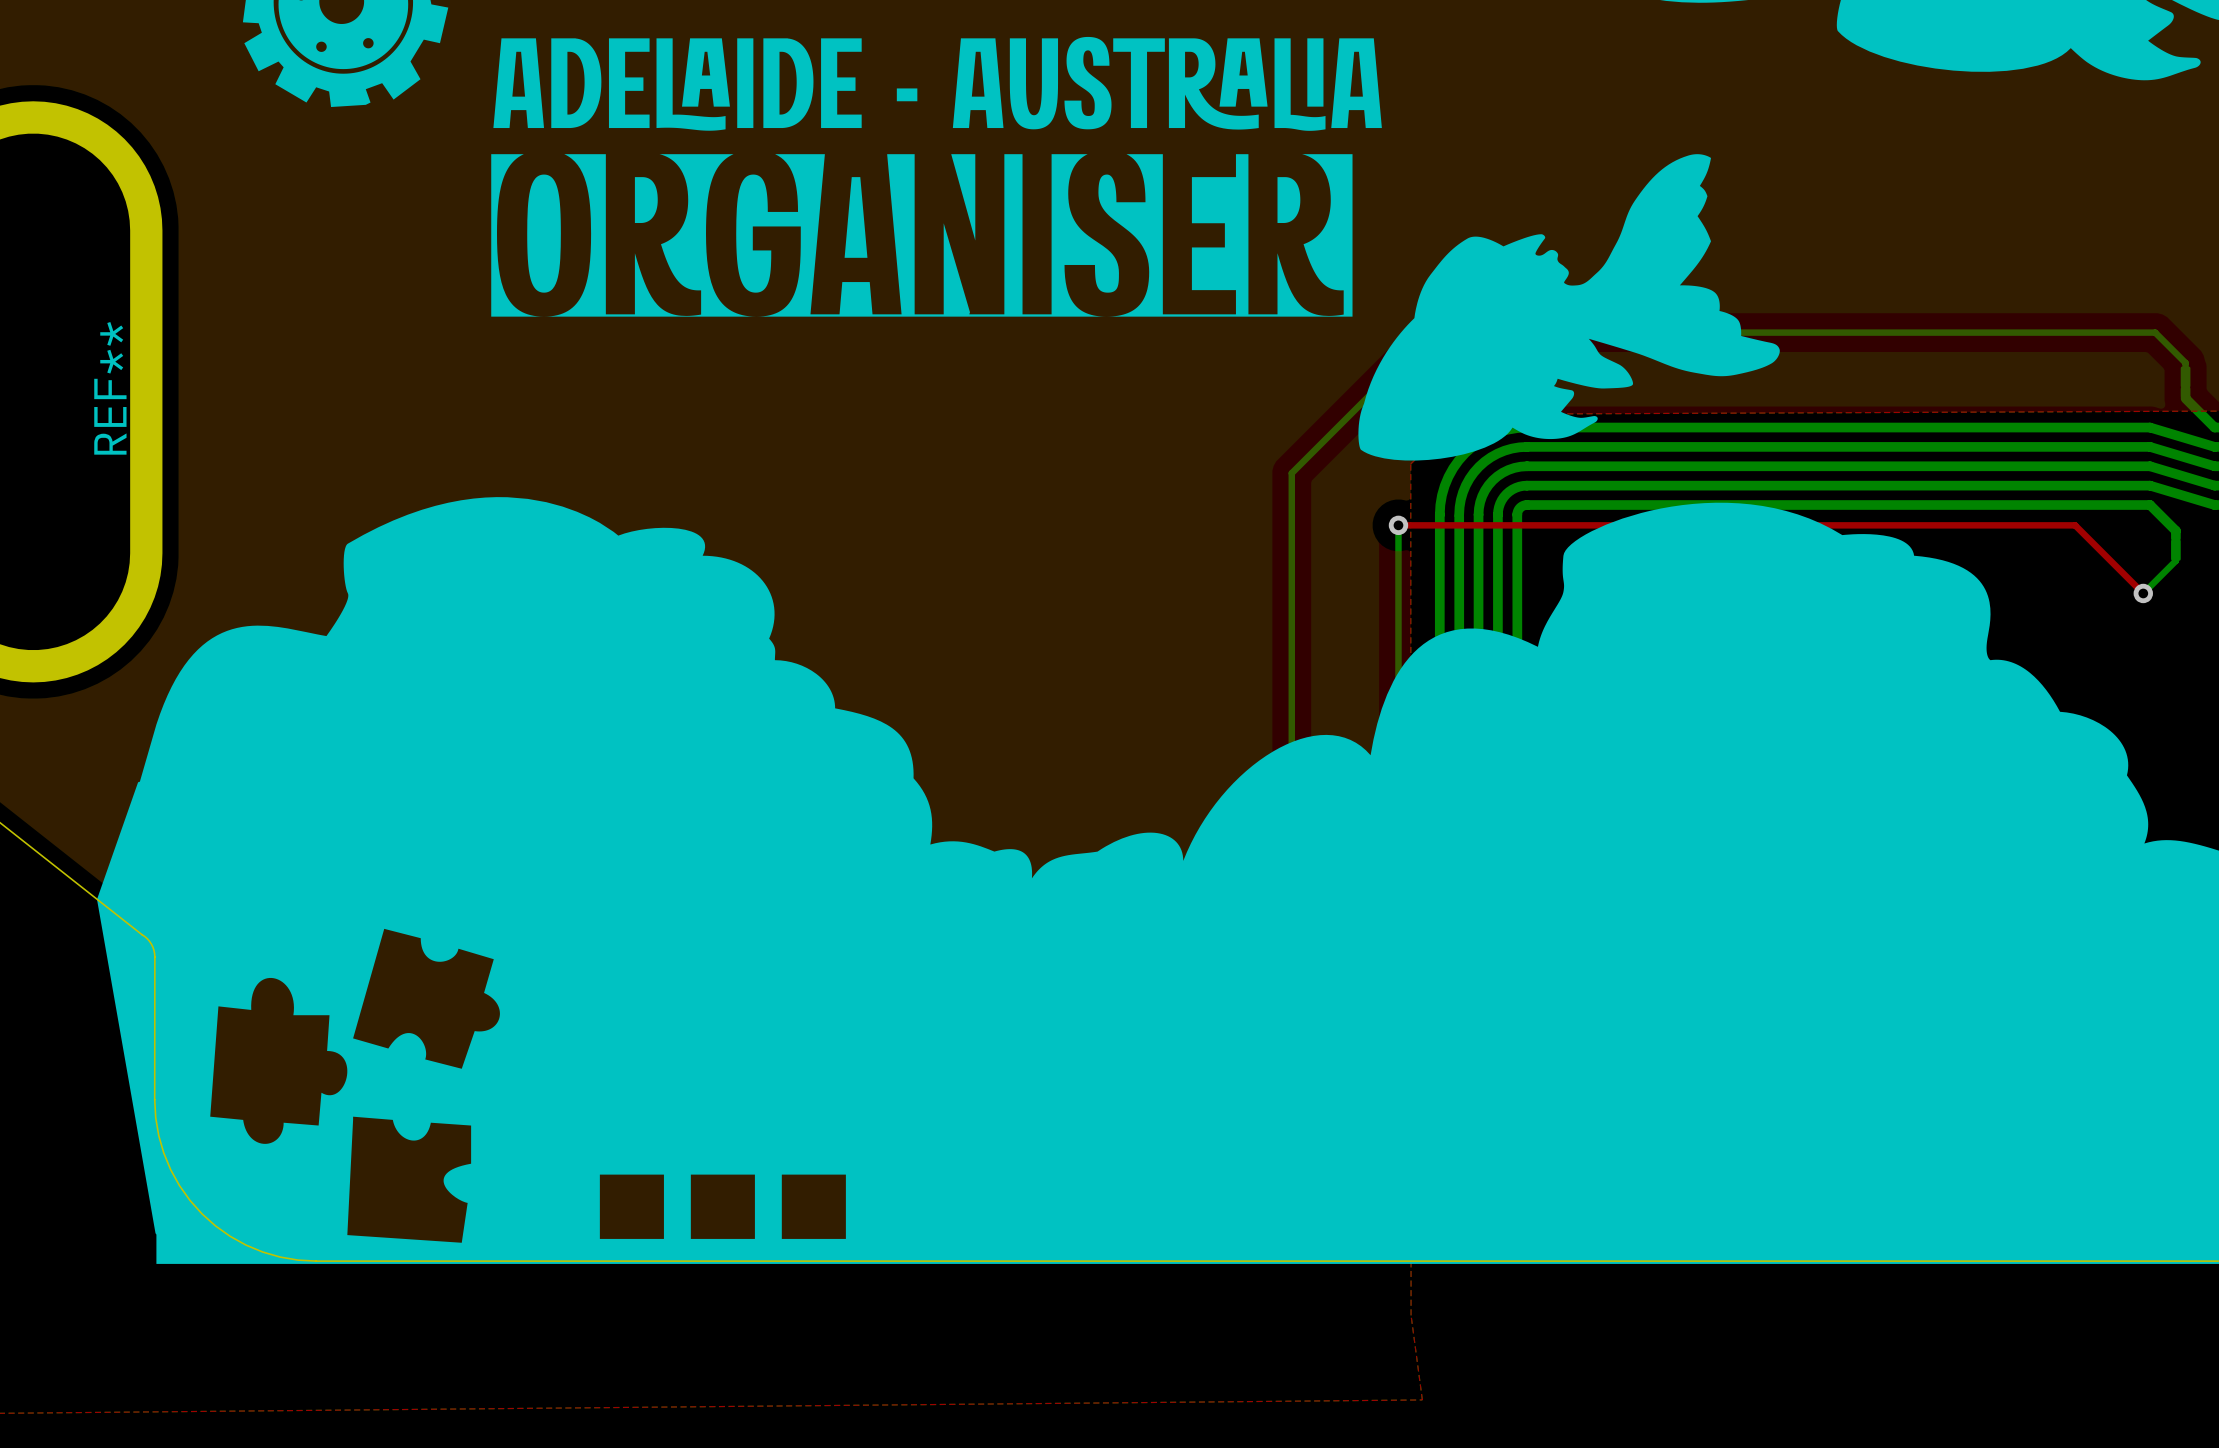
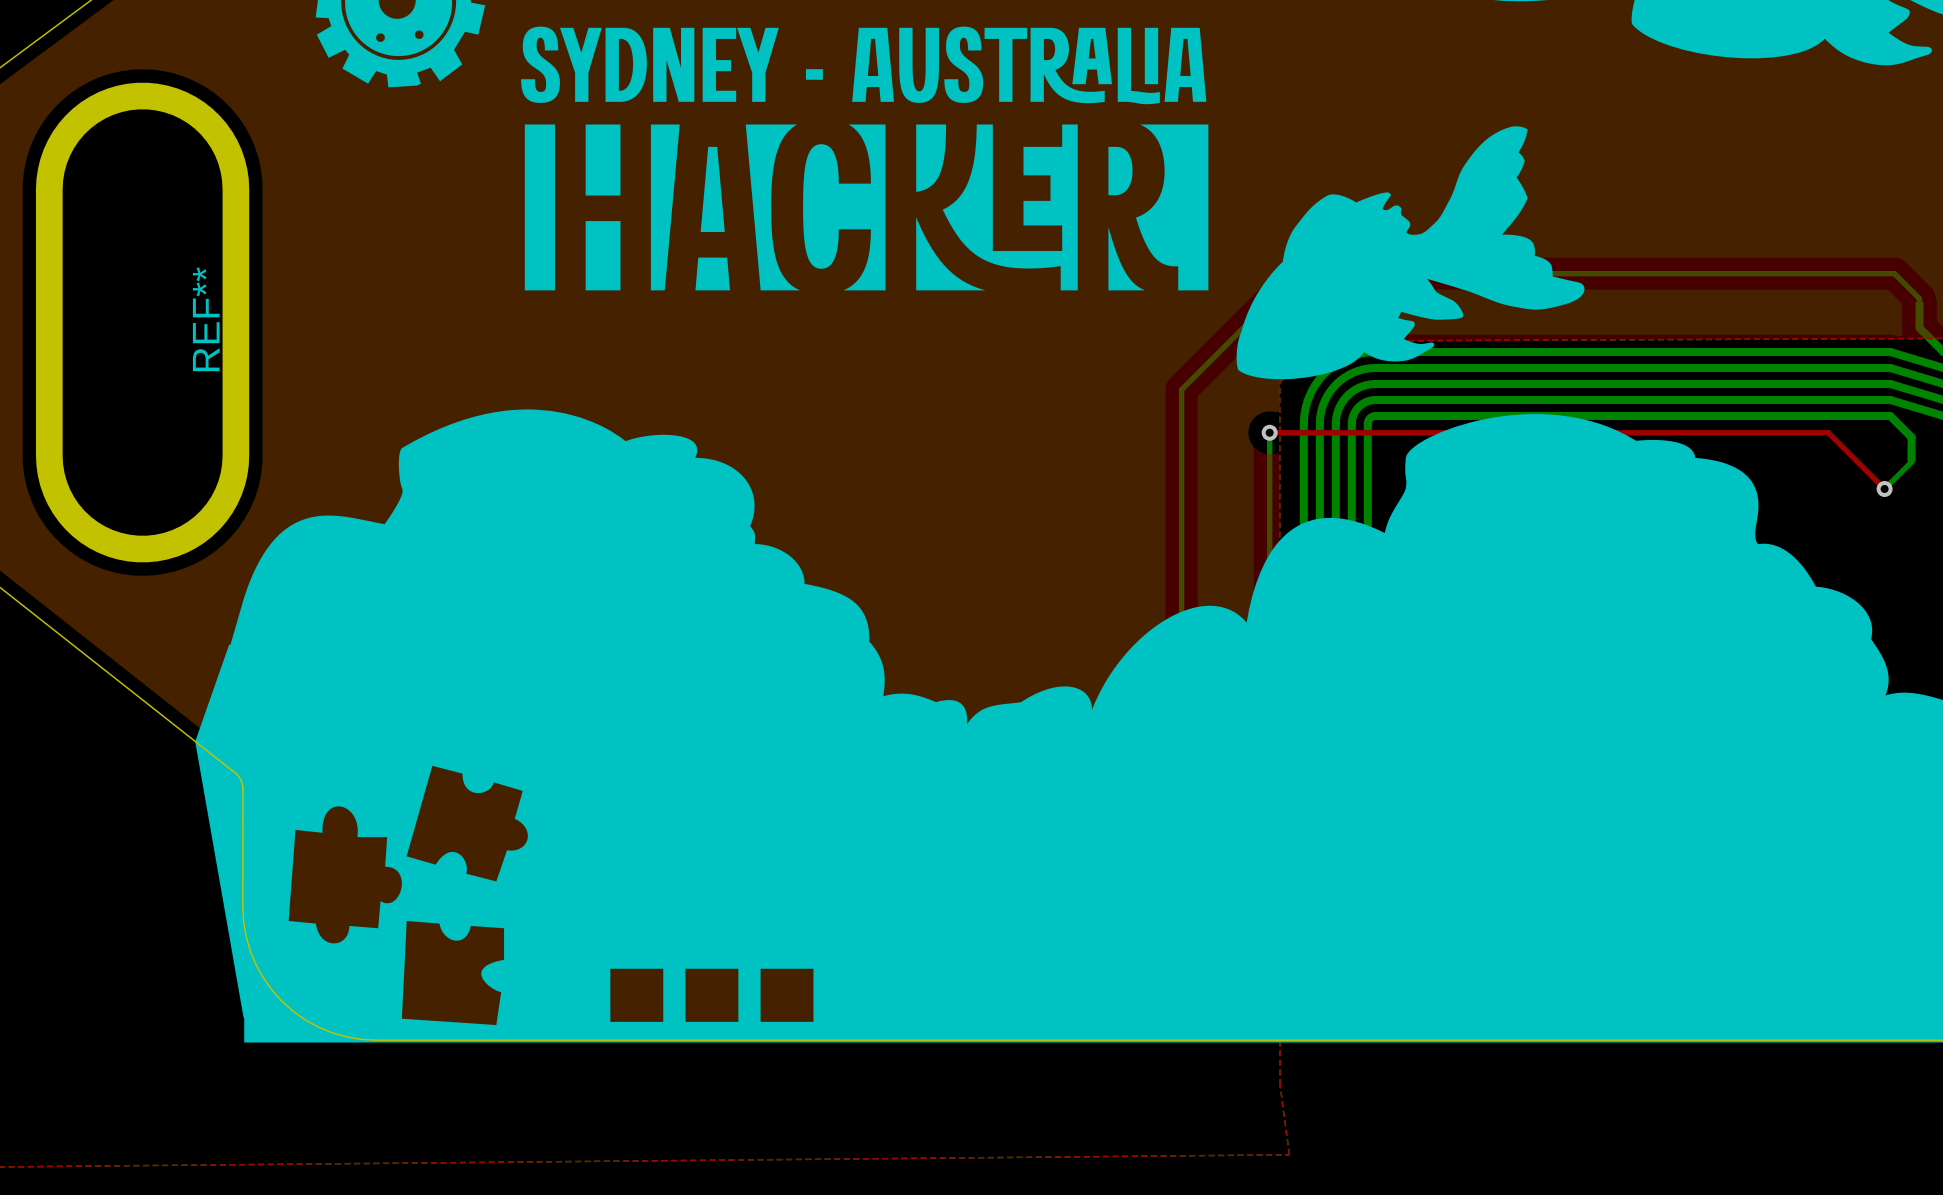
drawing: none -> [524, 27, 621, 291]
drawing: none -> [653, 27, 1209, 291]
drawing shape: [493, 38, 545, 129] -> [521, 26, 560, 103]
drawing: [608, 38, 1119, 317] -> none
drawing shape: [763, 38, 814, 129] -> [737, 27, 779, 102]
drawing position: (1243, 72) -> (1092, 56)
drawing position: (1315, 72) -> (1151, 56)
drawing position: (576, 83) -> (626, 64)
drawing position: (978, 83) -> (873, 64)
drawing position: (1033, 83) -> (919, 65)
drawing position: (1088, 83) -> (963, 64)
drawing position: (1139, 83) -> (1005, 64)
drawing position: (1213, 83) -> (1067, 65)
drawing position: (1356, 83) -> (1185, 64)
drawing position: (1300, 84) -> (1138, 66)
drawing position: (907, 94) -> (814, 74)
drawing: [491, 154, 561, 317] -> none
drawing shape: [544, 154, 757, 317] -> [650, 124, 680, 291]
drawing shape: [951, 154, 976, 241] -> [916, 124, 947, 192]
drawing shape: [1098, 154, 1353, 317] -> [1108, 146, 1133, 196]
drawing: [634, 177, 658, 224] -> none
drawing: [1277, 177, 1301, 224] -> none

